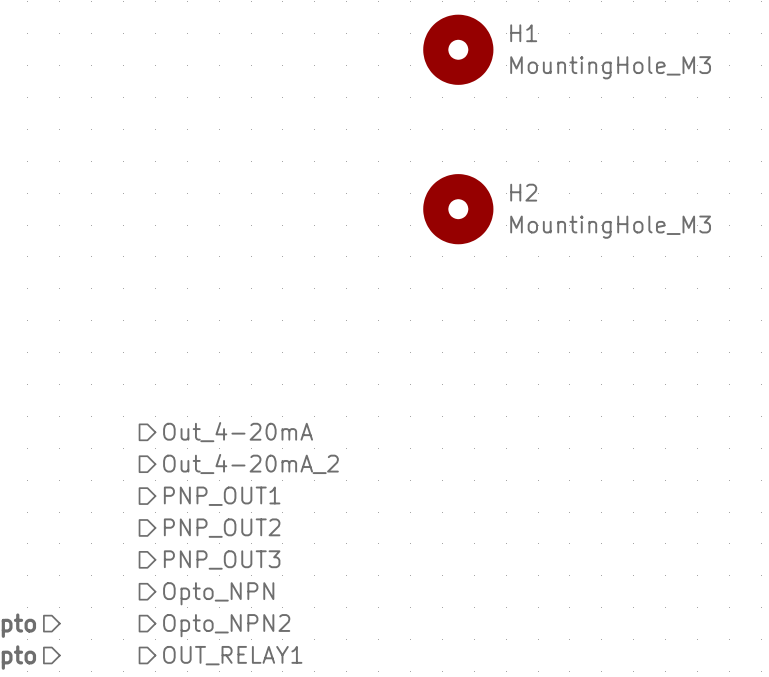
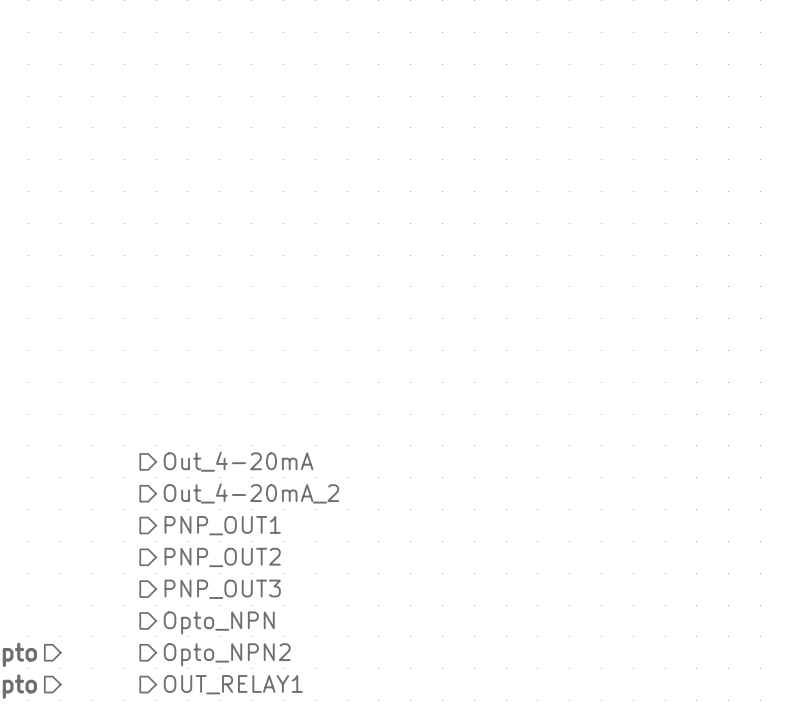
H1: MountingHole_M3 (458, 49) -> none
H2: MountingHole_M3 (458, 209) -> none

